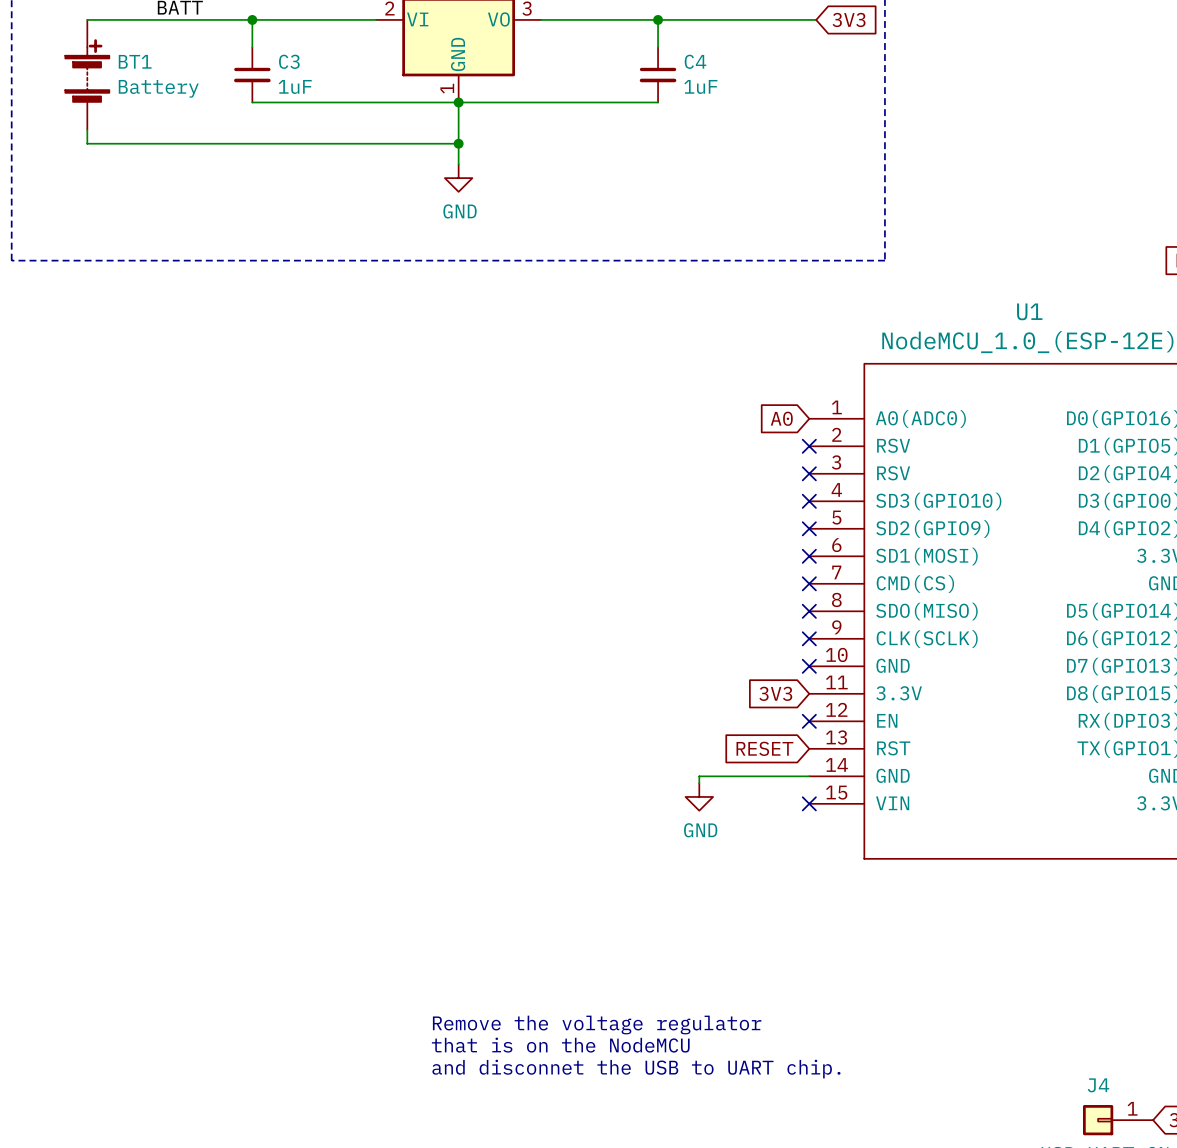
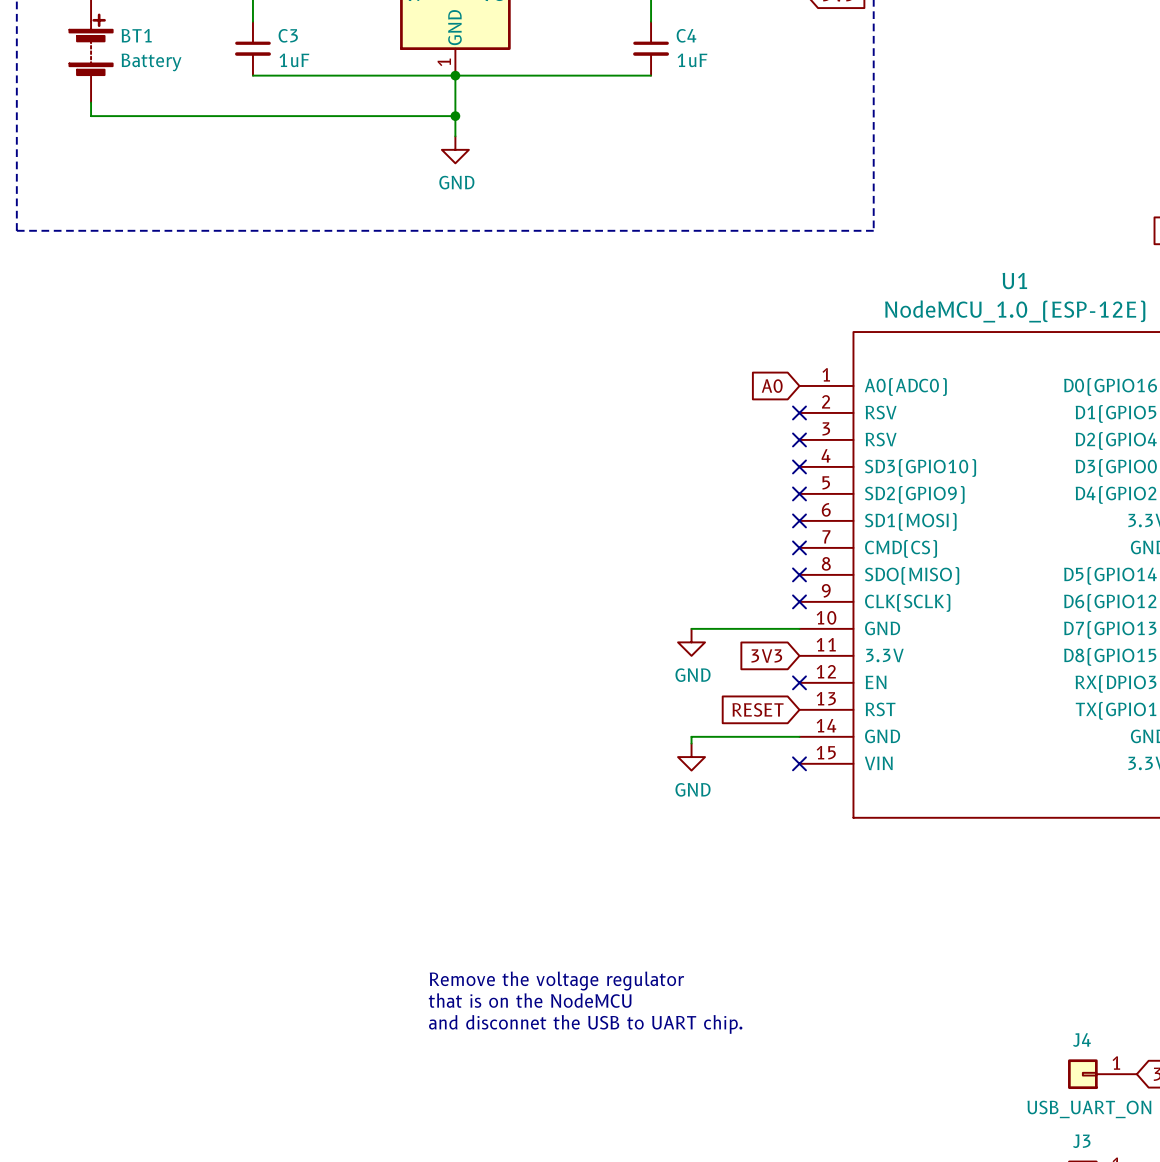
wire: none -> (691, 628) (799, 628)
no-connect mark: (809, 666) -> none
power symbol: none -> GND (691, 642)

